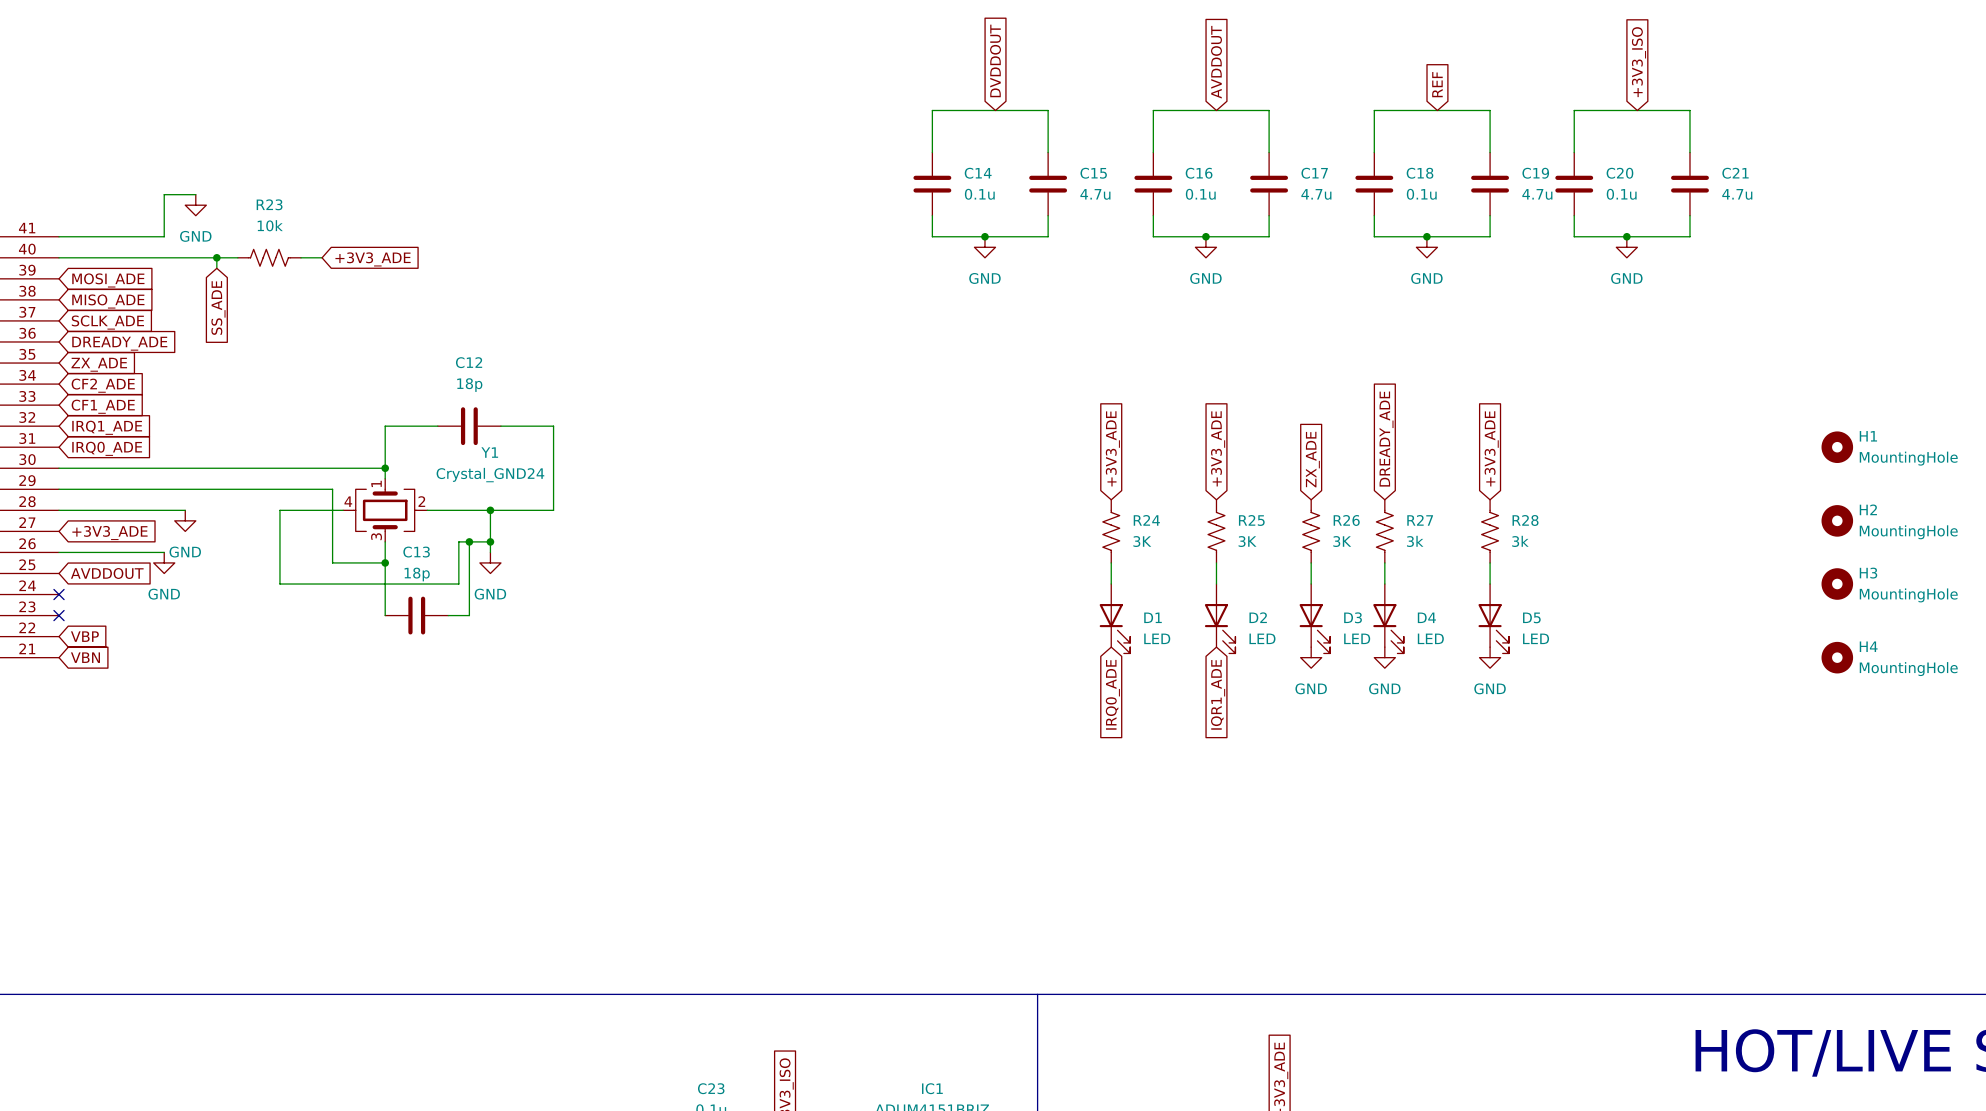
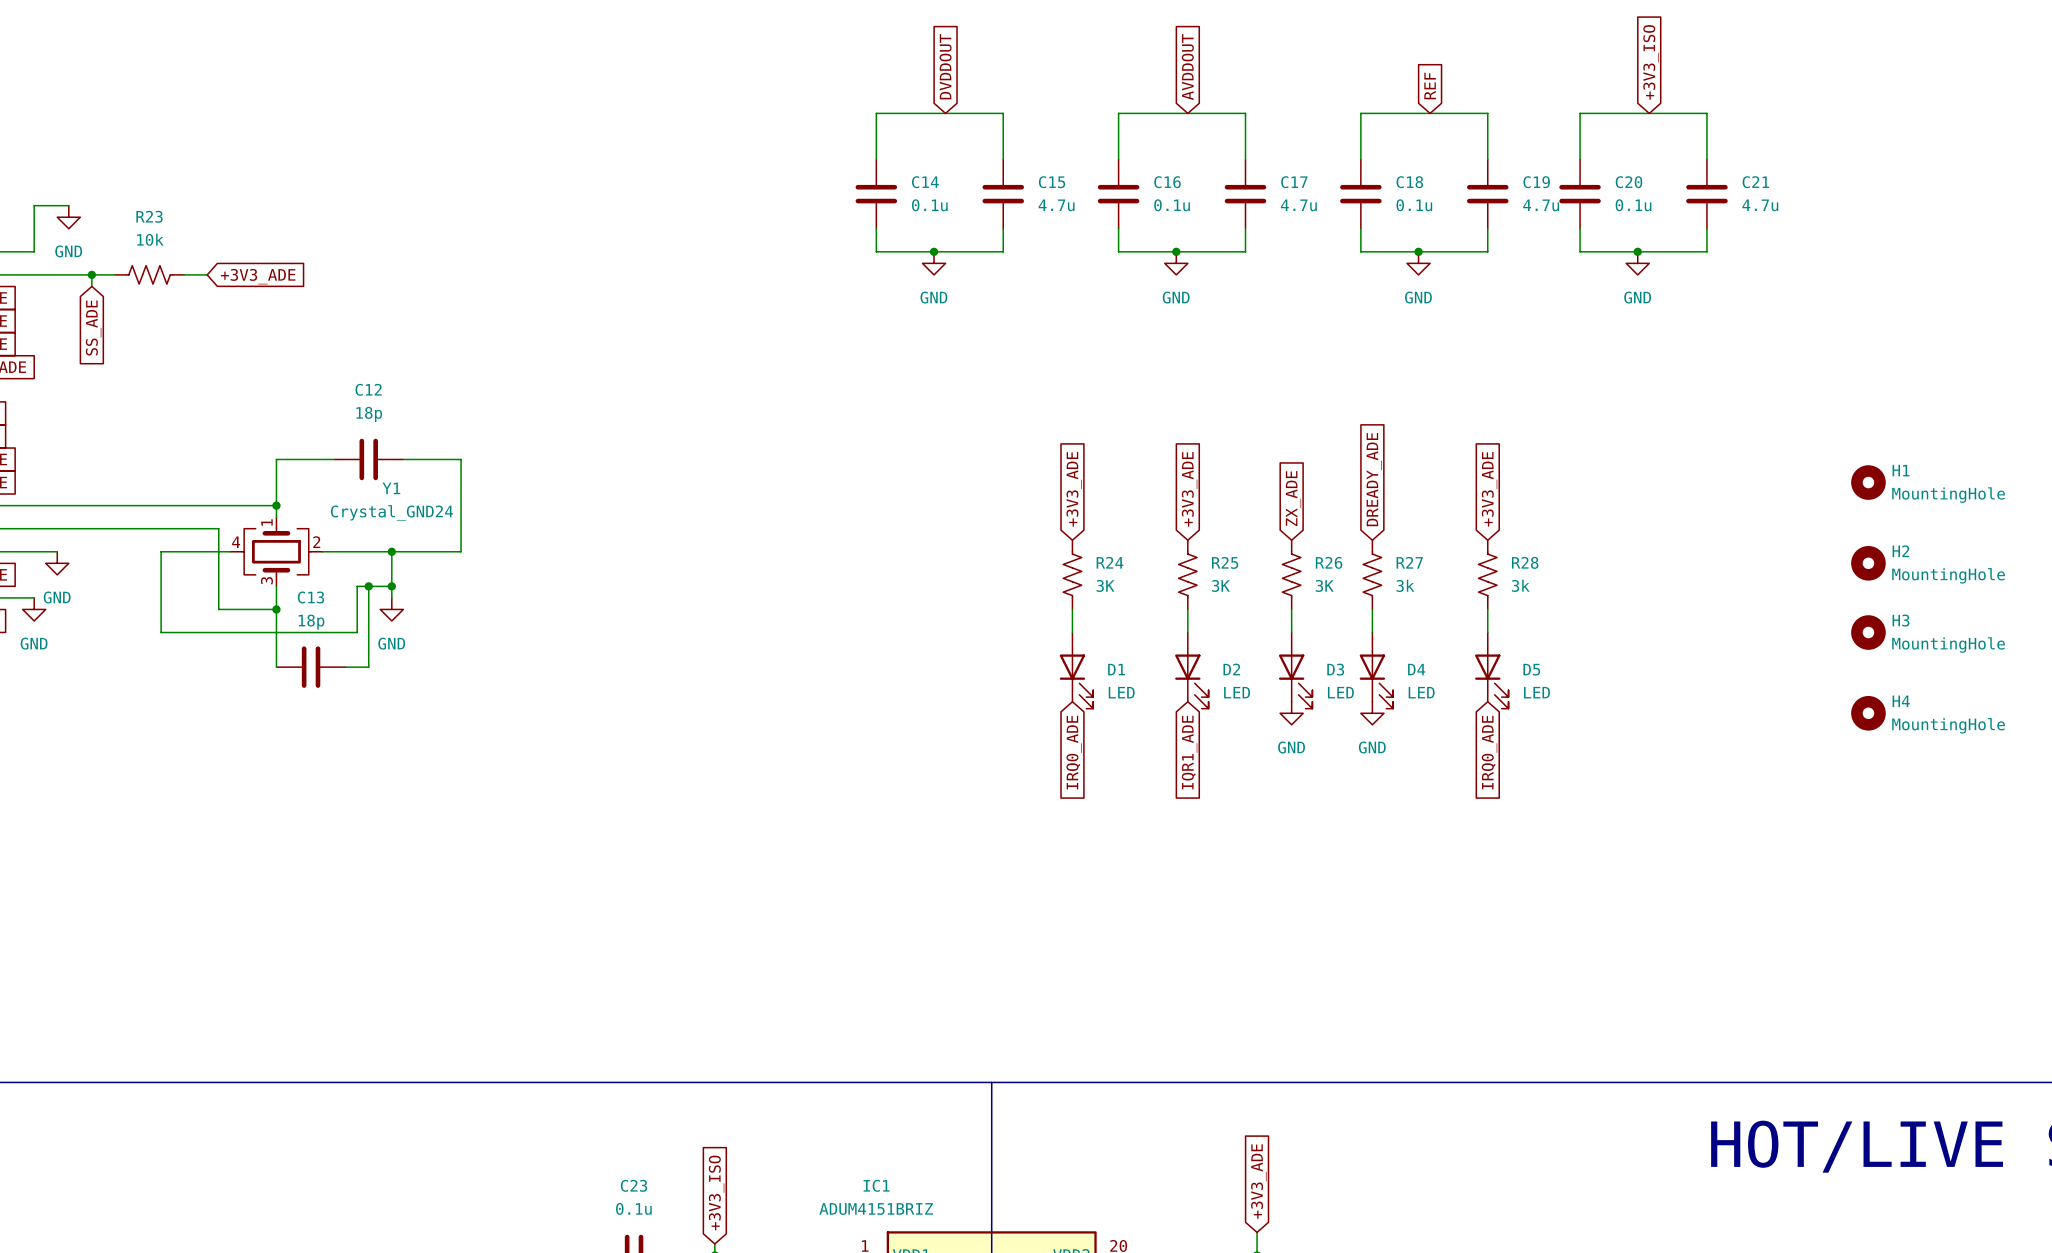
power symbol: GND (1490, 657) -> none
global label: none -> IRQ0_ADE (1489, 752)

